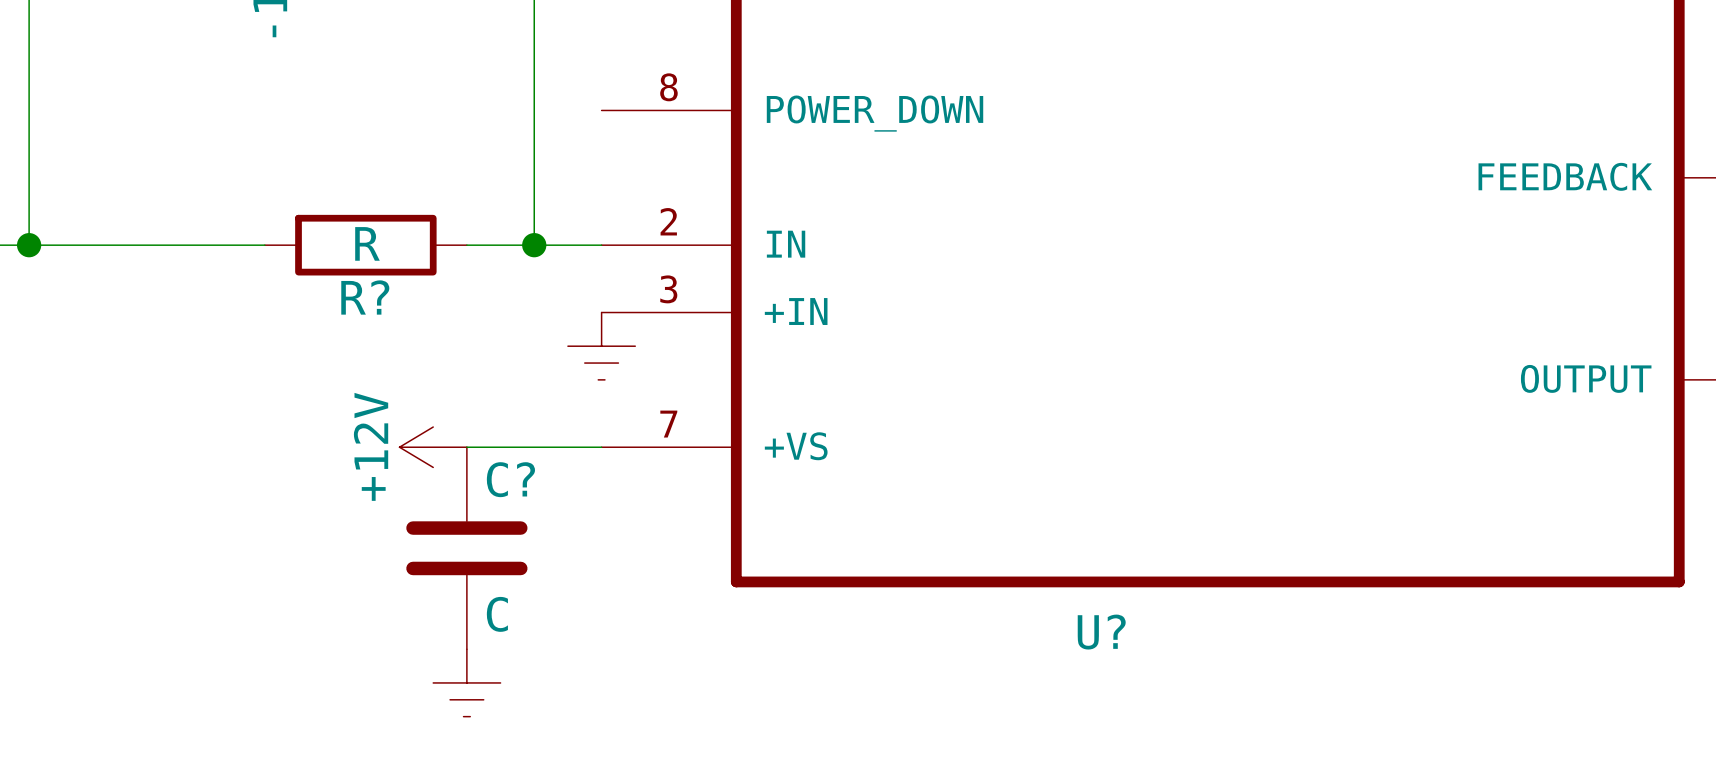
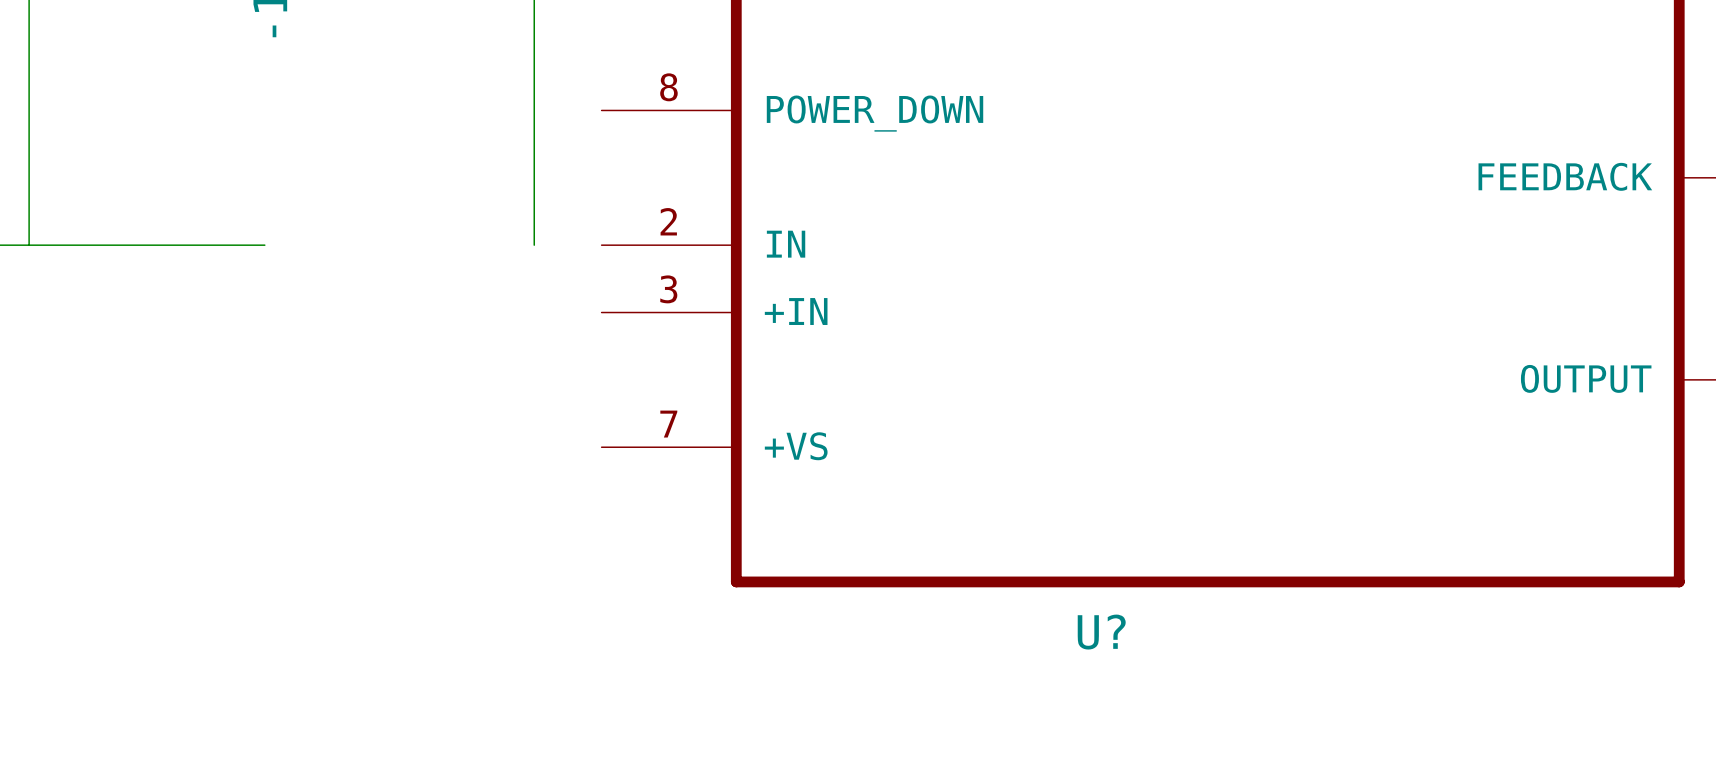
junction: (29, 245) -> none
R?: R (365, 245) -> none
wire: (466, 245) (601, 245) -> none
junction: (534, 245) -> none
power symbol: (601, 346) -> none
power symbol: +12V (433, 447) -> none
wire: (466, 447) (601, 447) -> none
C?: C (466, 548) -> none
power symbol: (466, 682) -> none

